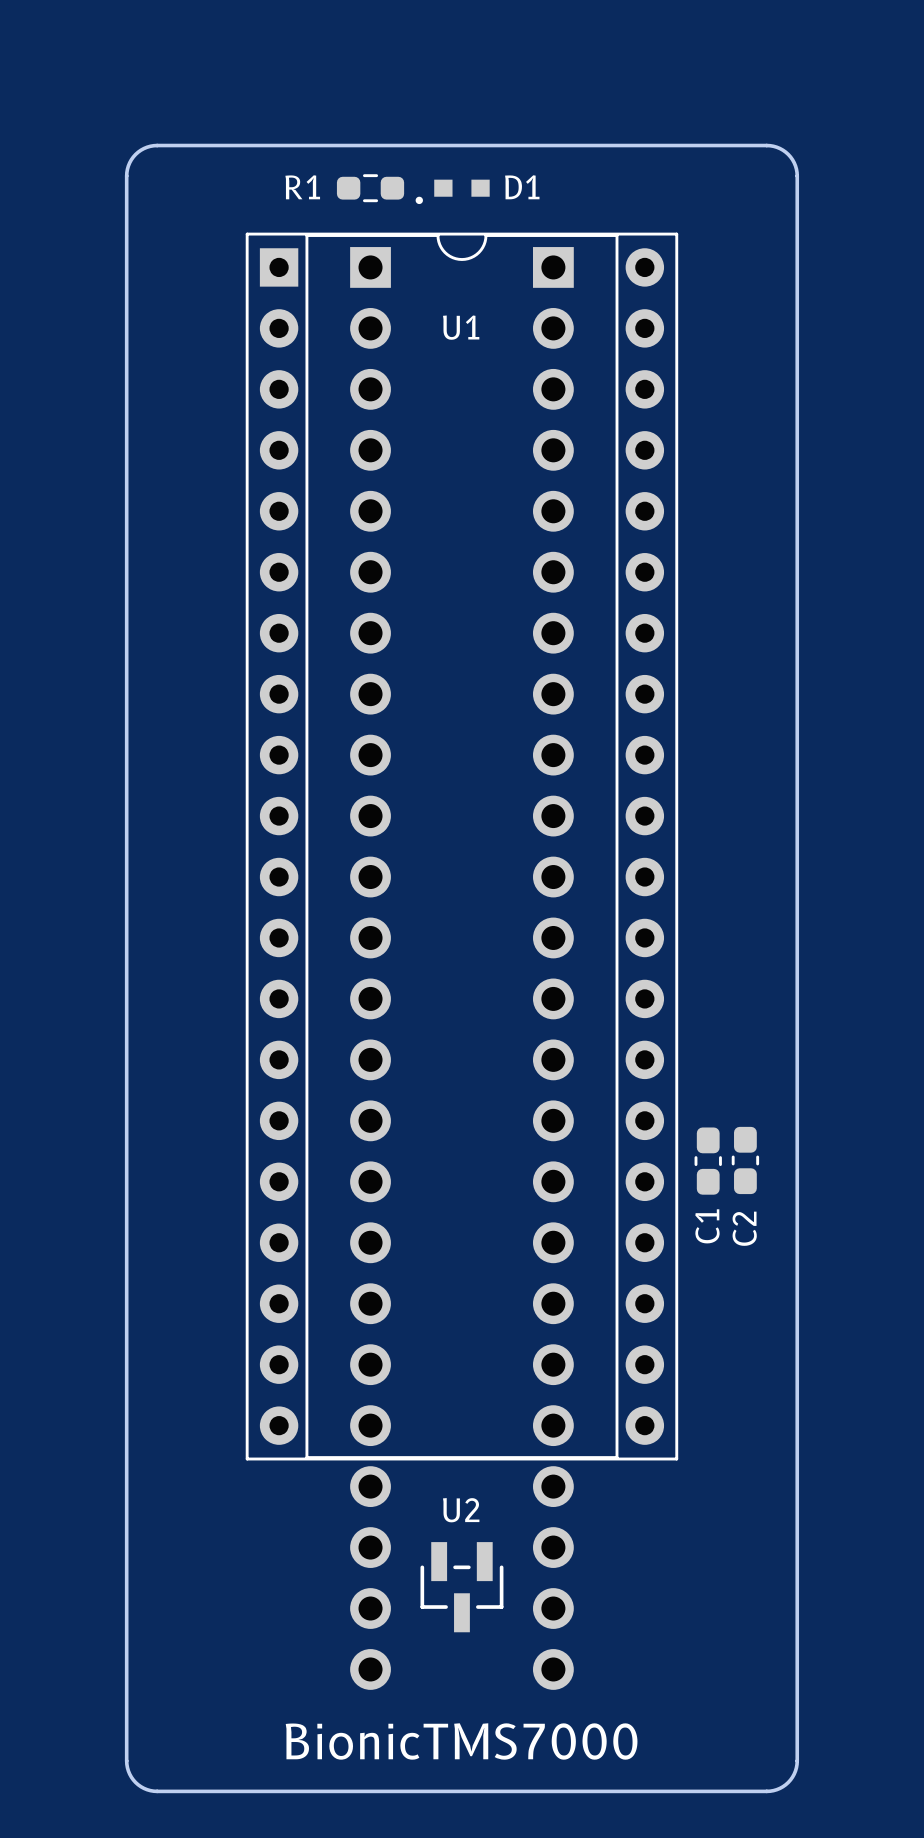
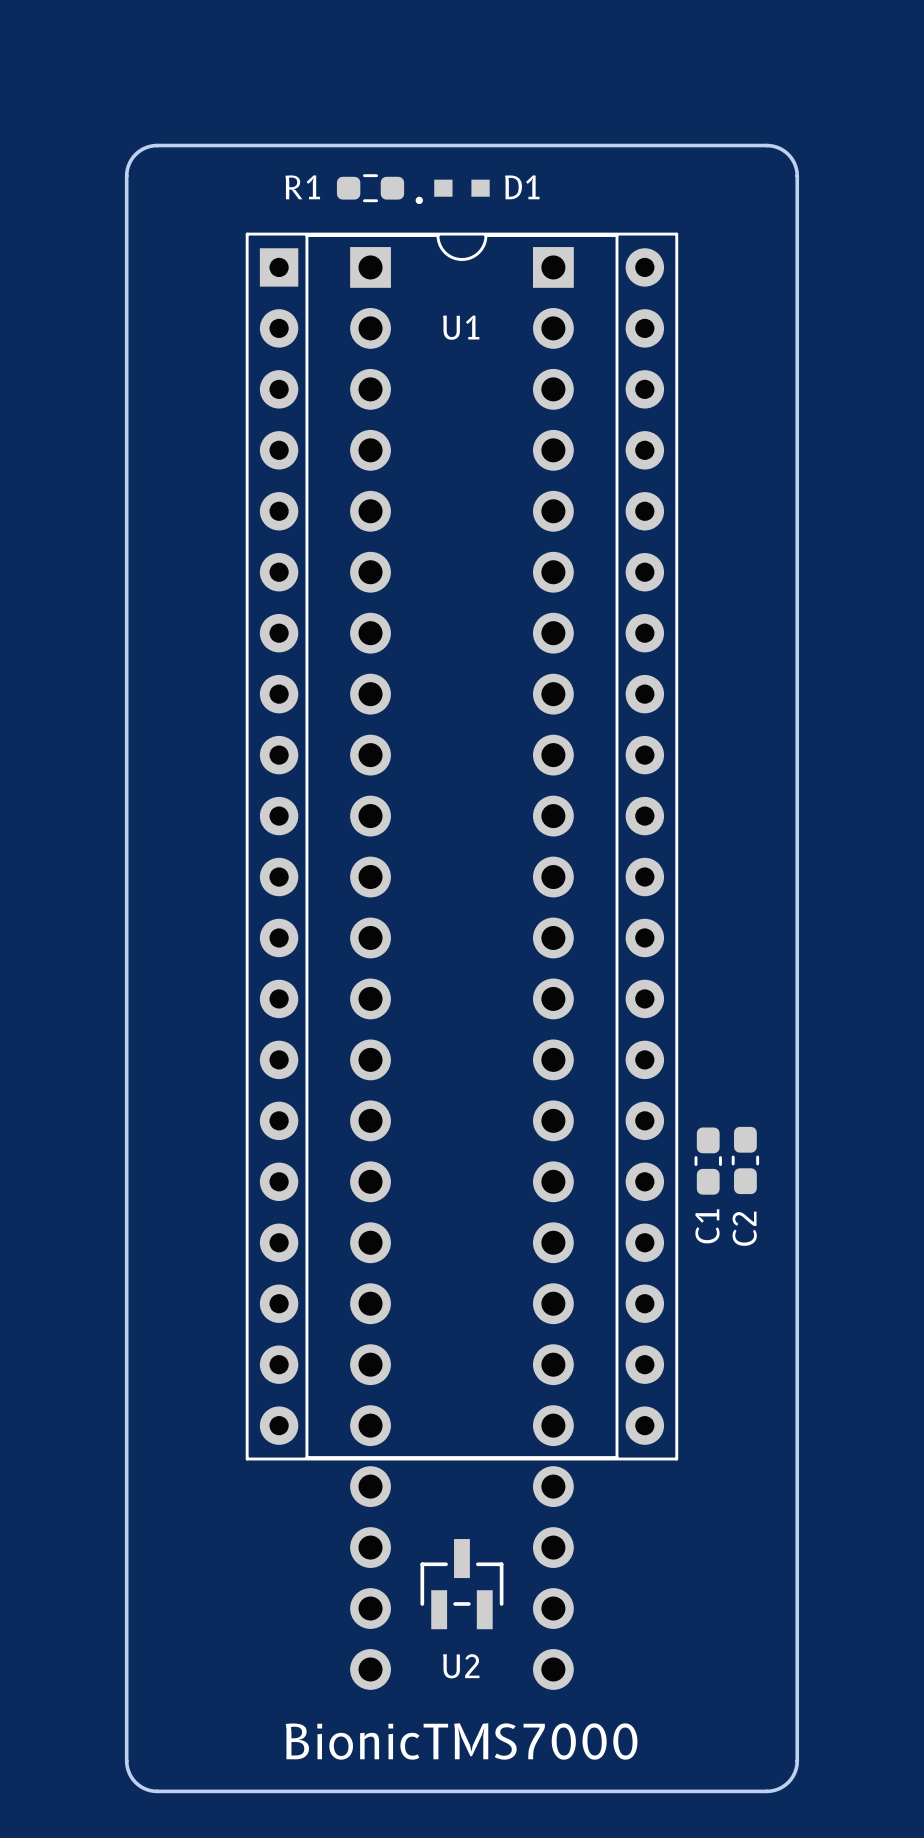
U2 rotation: 0° (461, 1587) -> 180° (461, 1584)

